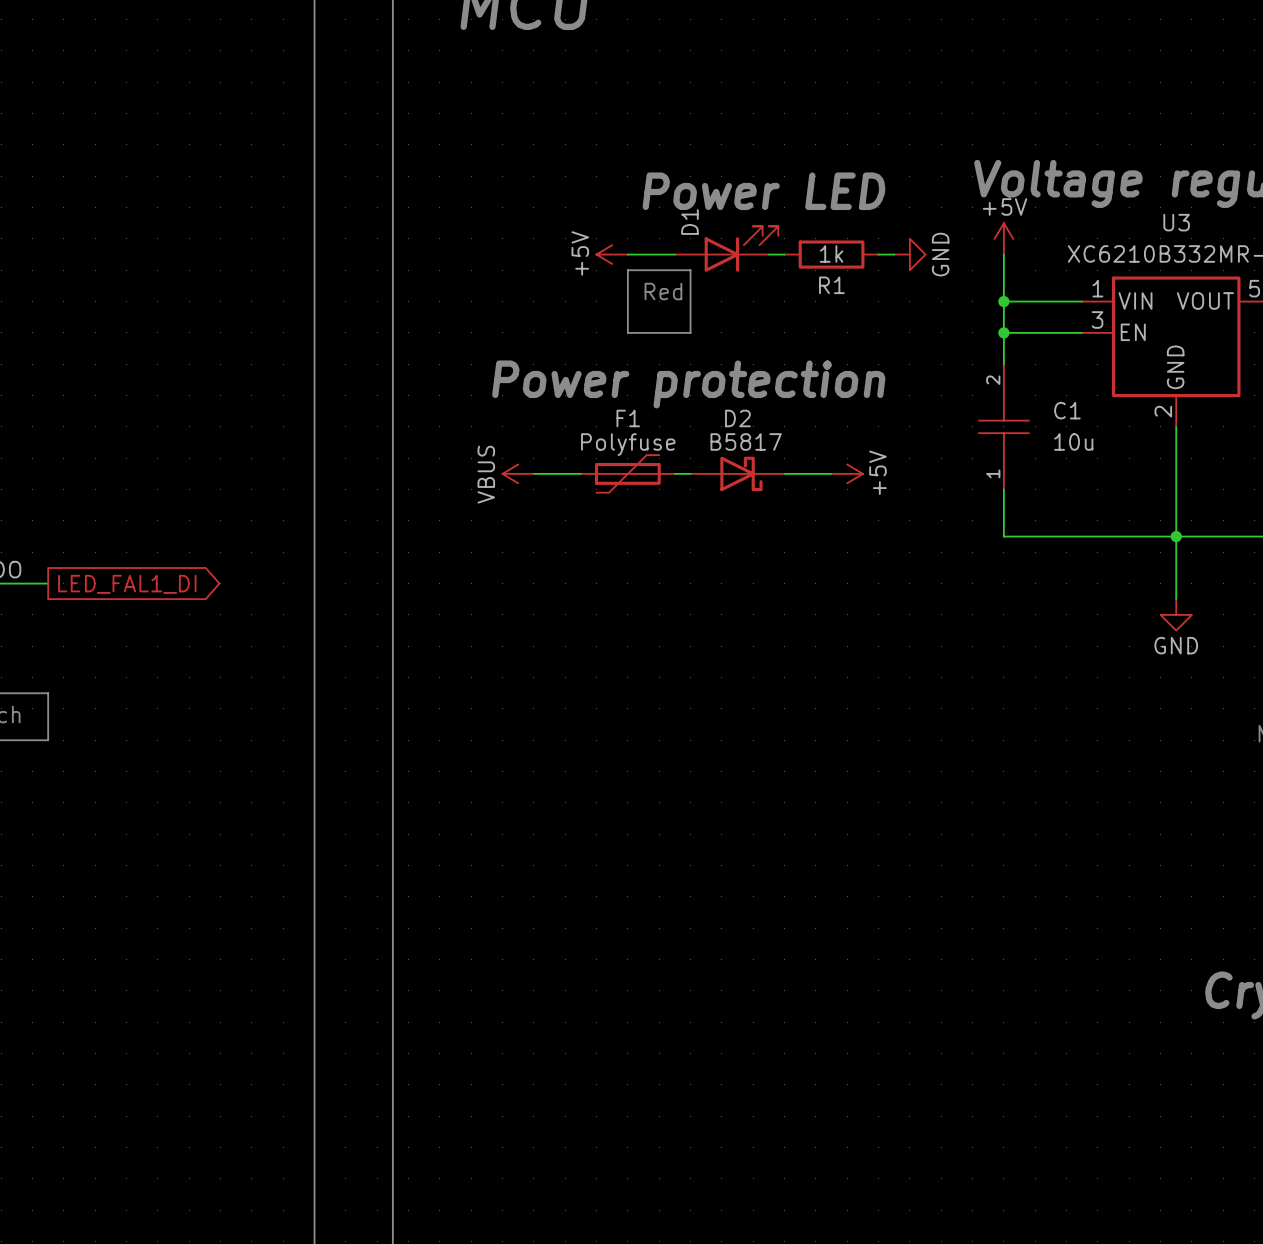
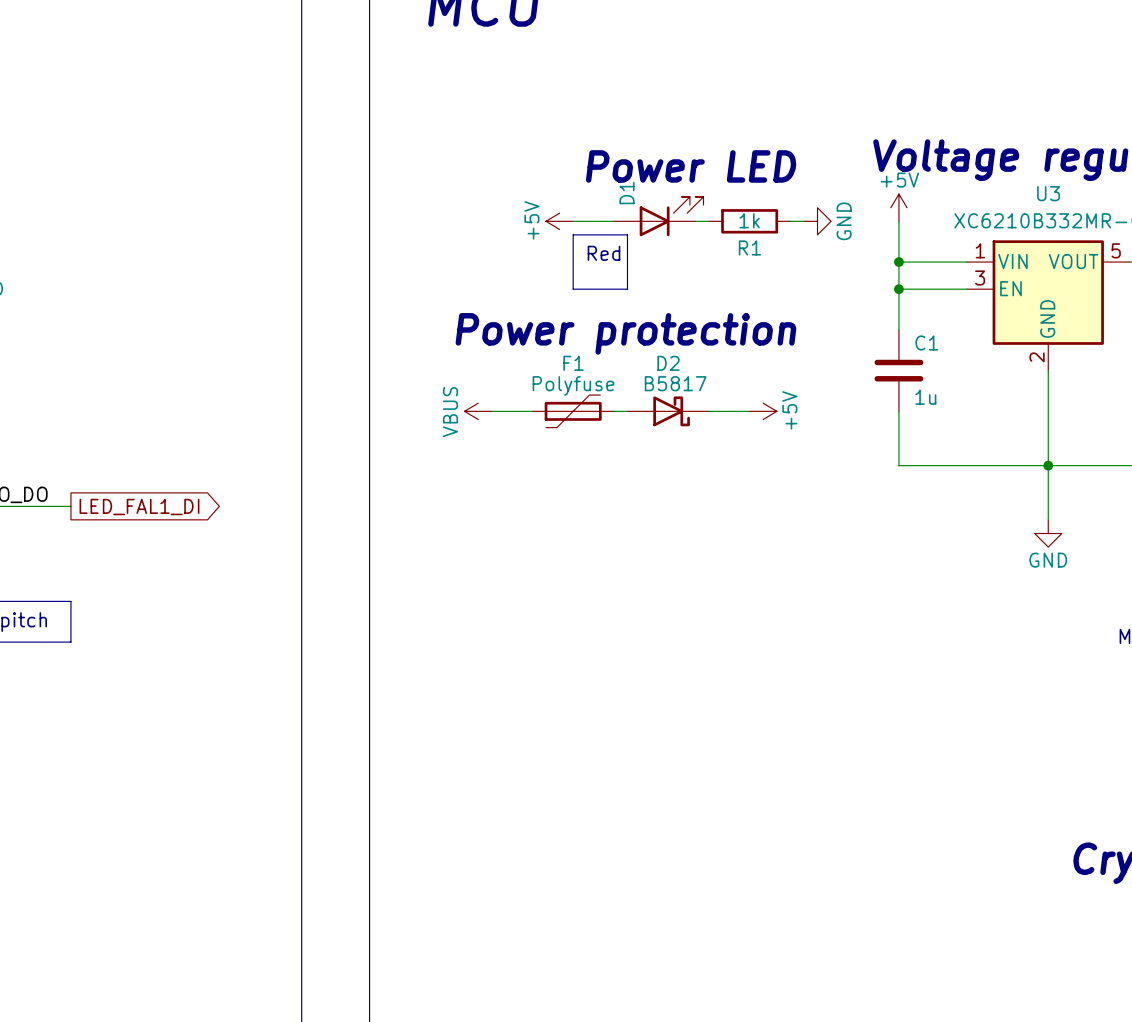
C1 symbol: [978, 364, 1029, 490] -> [874, 329, 924, 412]
C1 name position: C1 (1067, 410) -> C1 (926, 342)
C1 value: 10u (1073, 441) -> 1u (925, 397)

